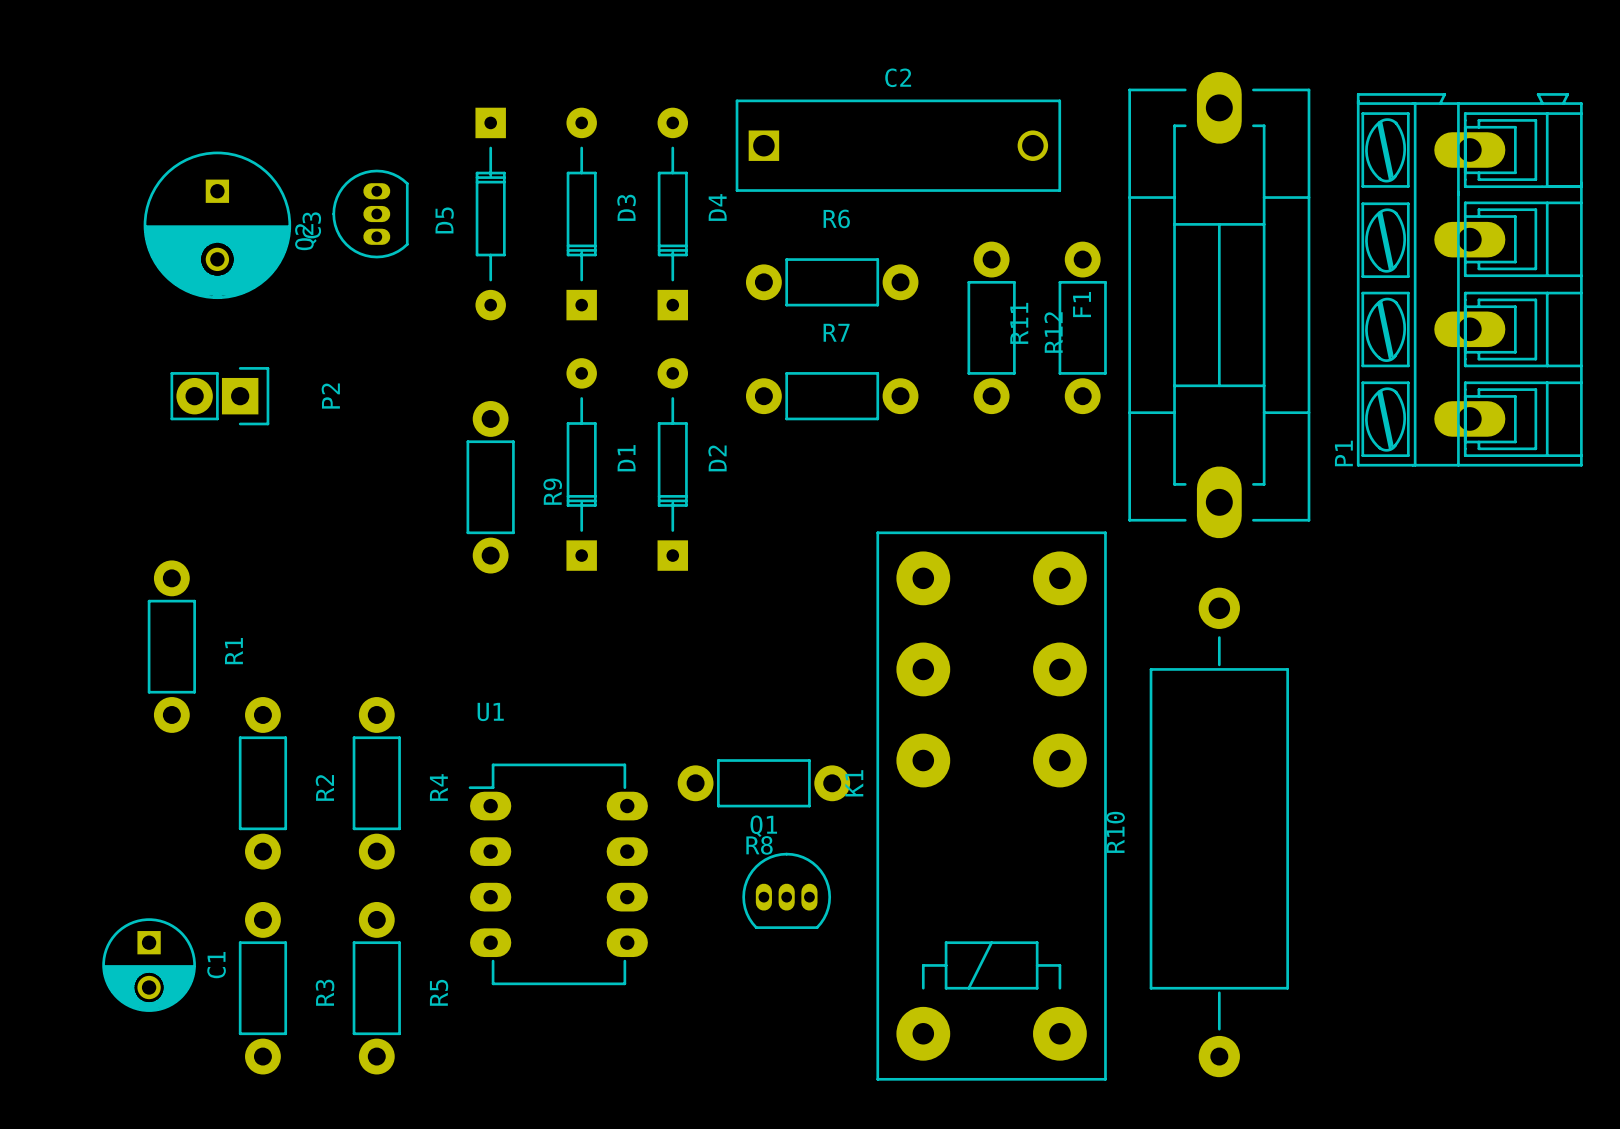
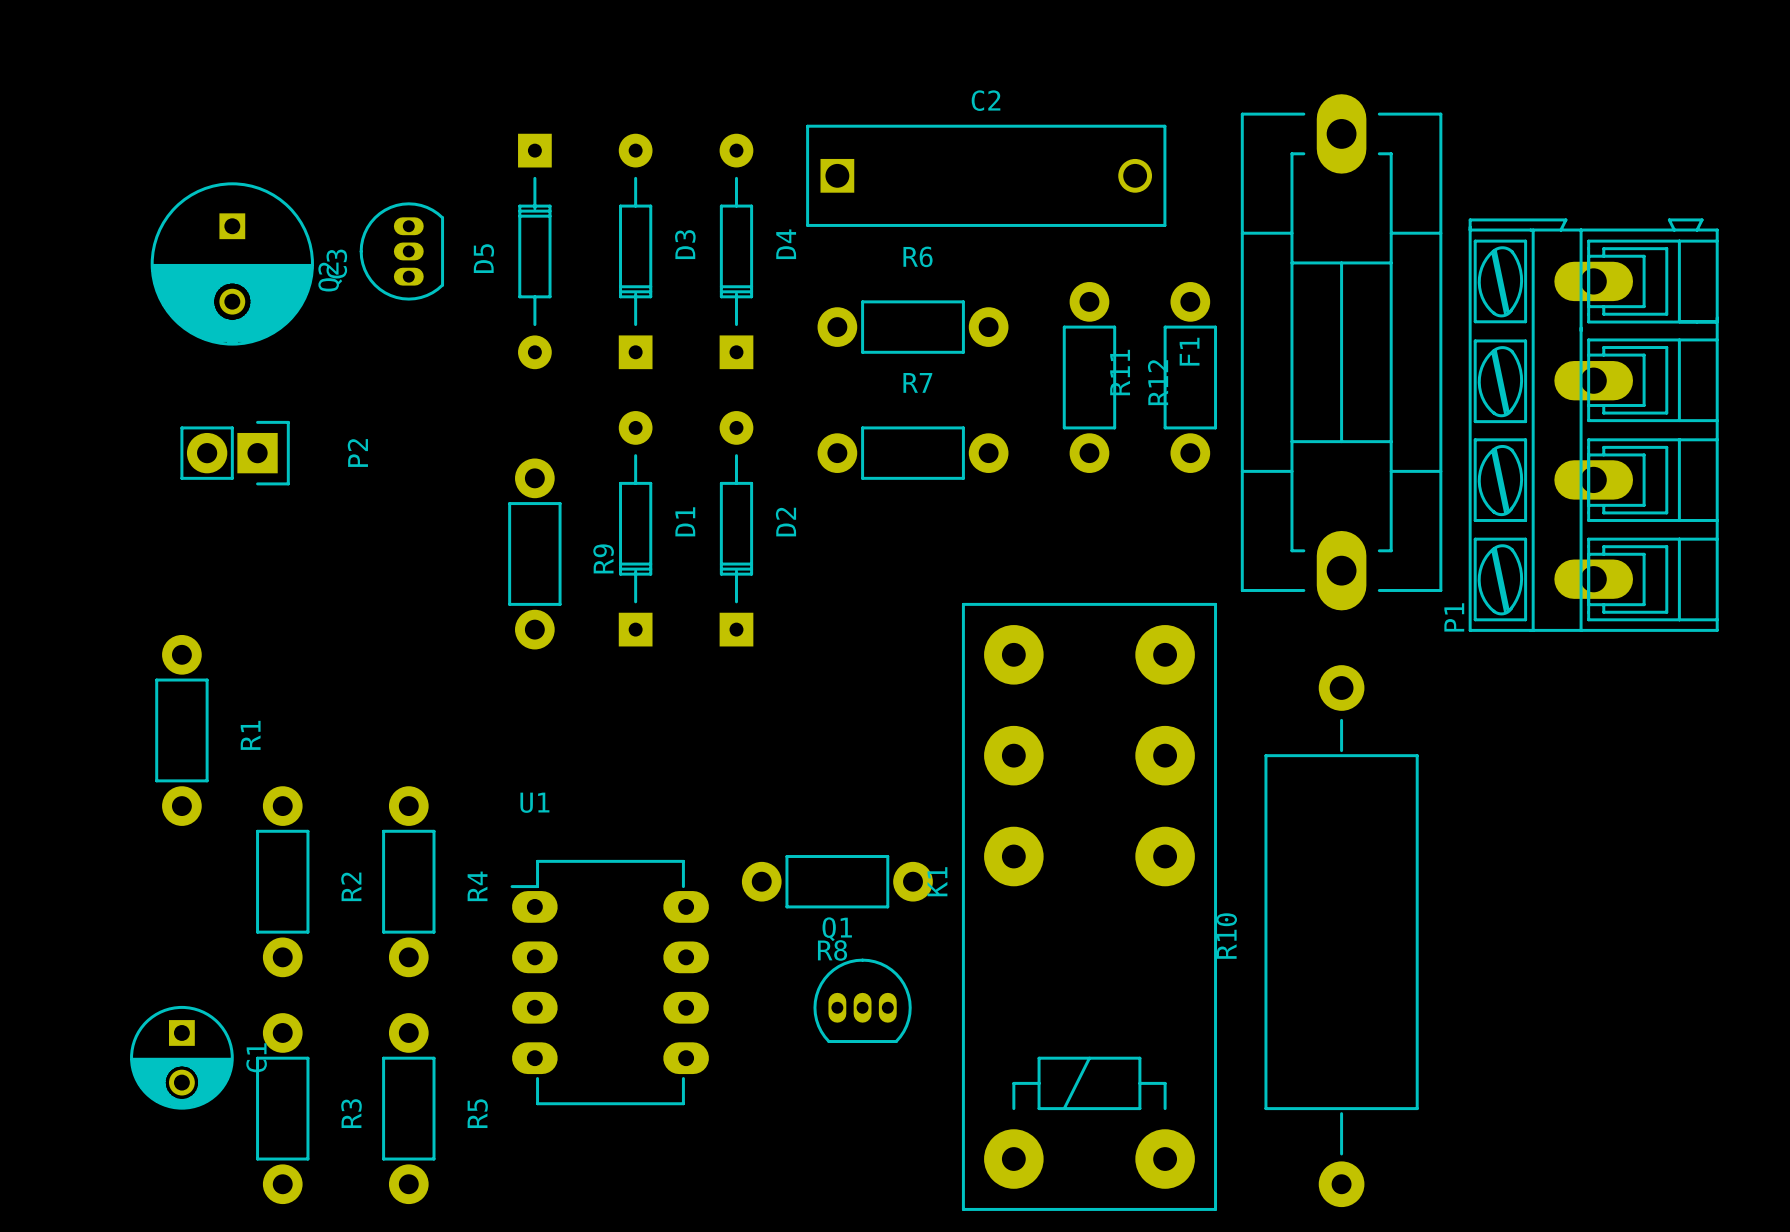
P1 position: (1469, 279) -> (1593, 425)
C1 position: (149, 965) -> (181, 1057)

